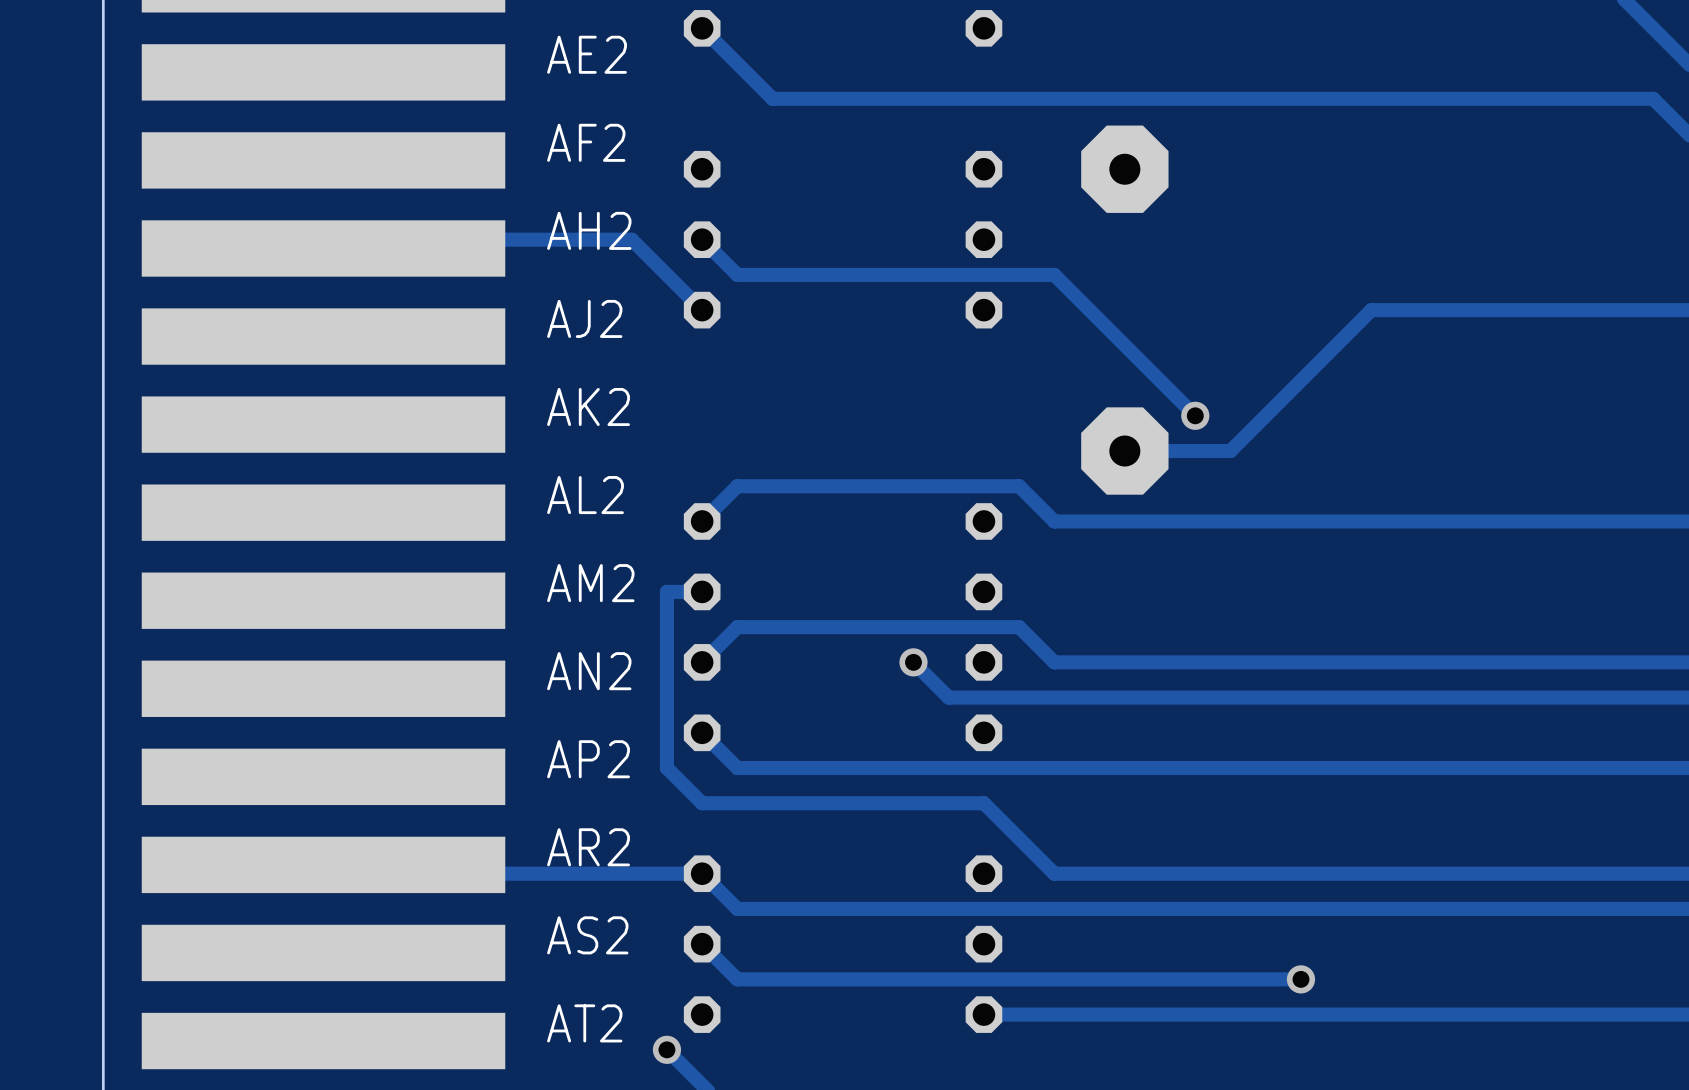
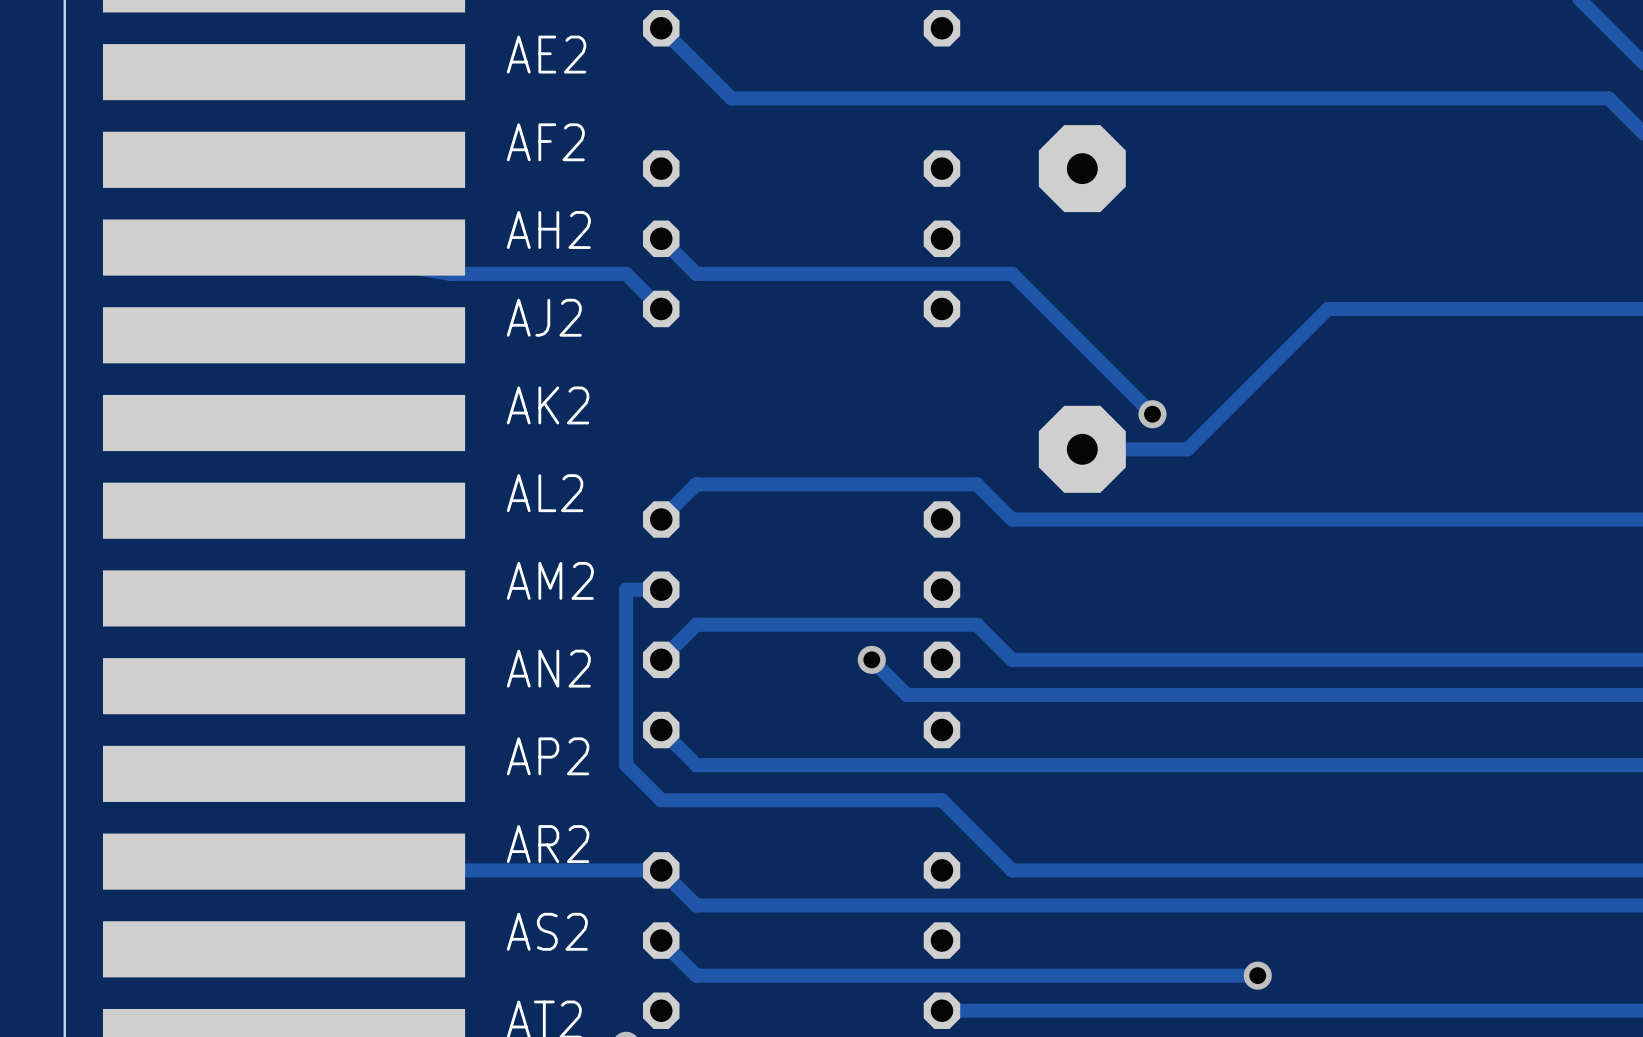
track: (323, 248) (455, 239) (631, 239) (666, 274) -> (284, 247) (450, 273) (626, 273)

